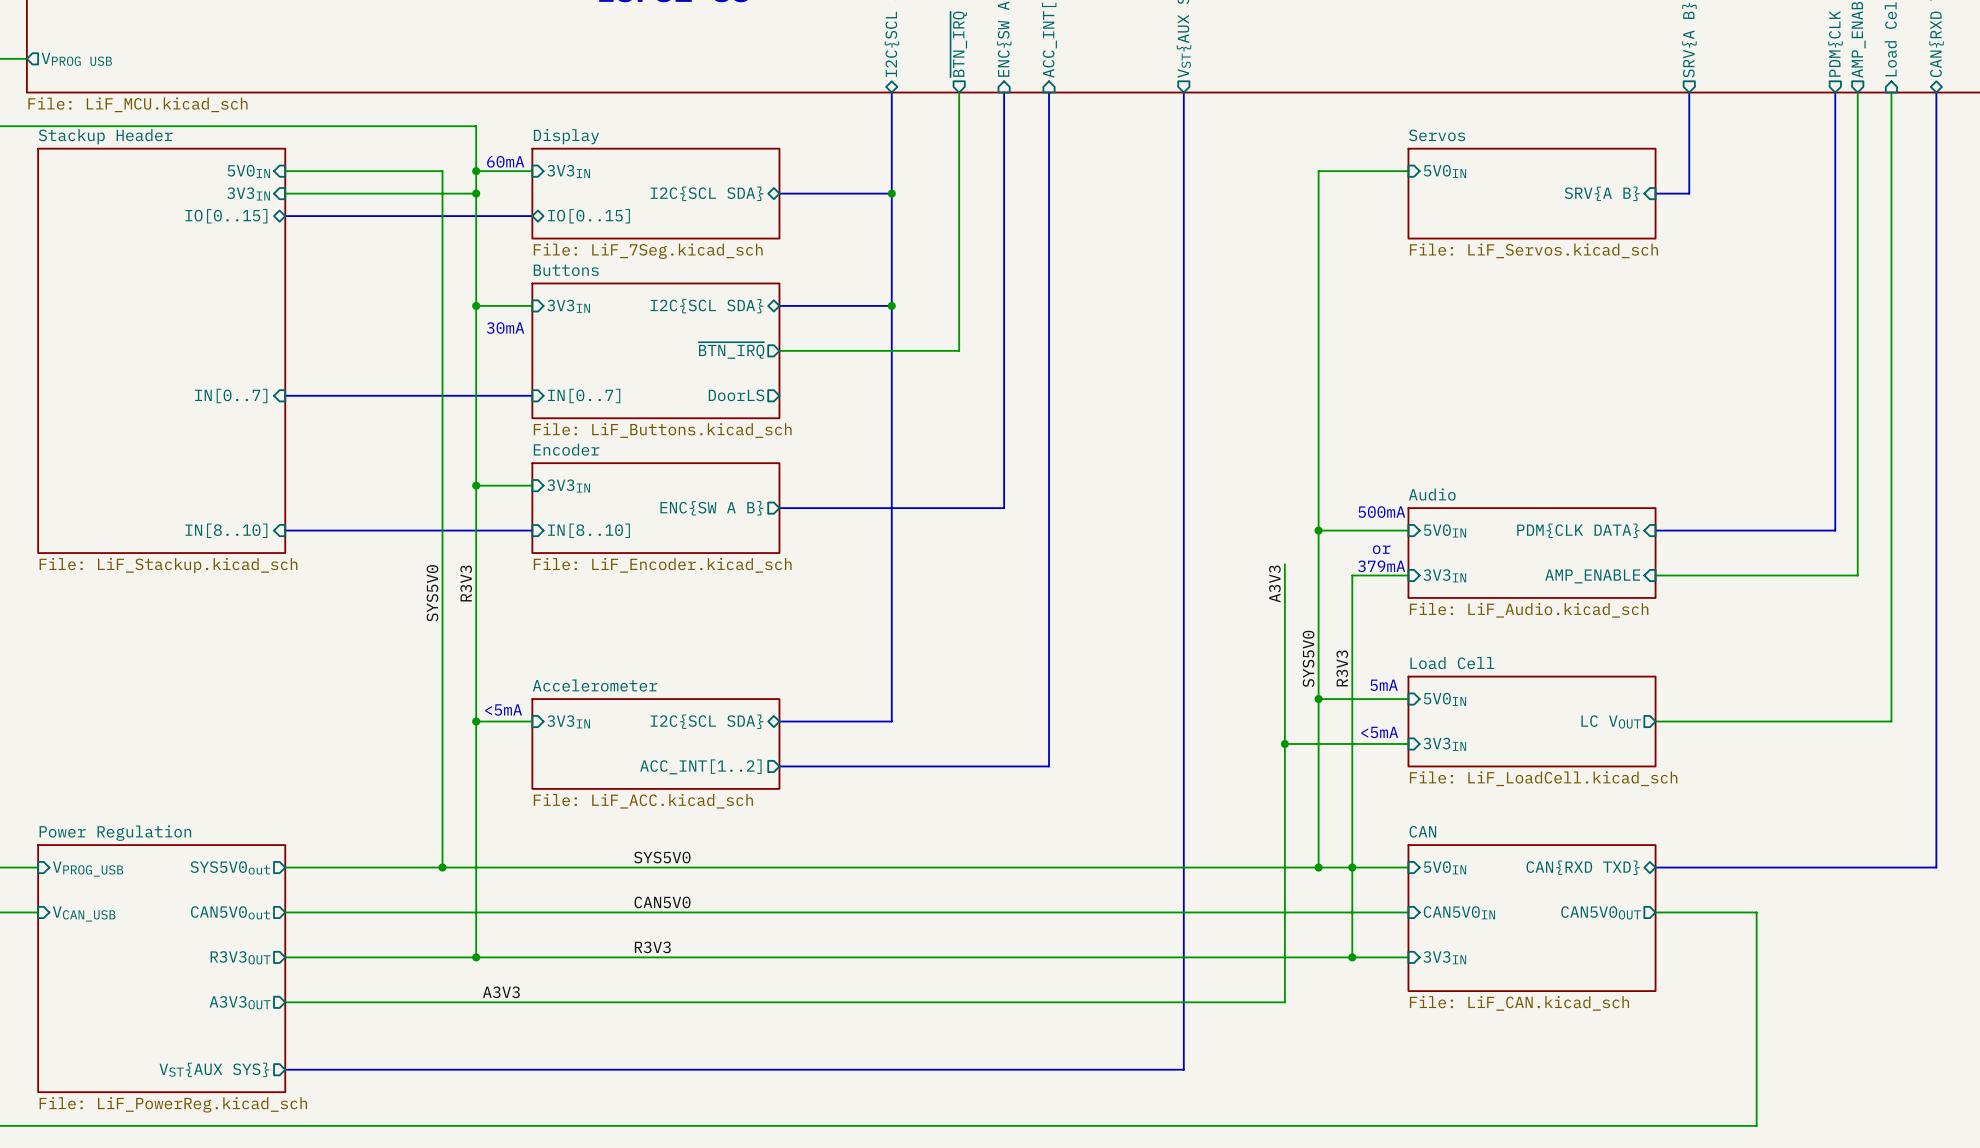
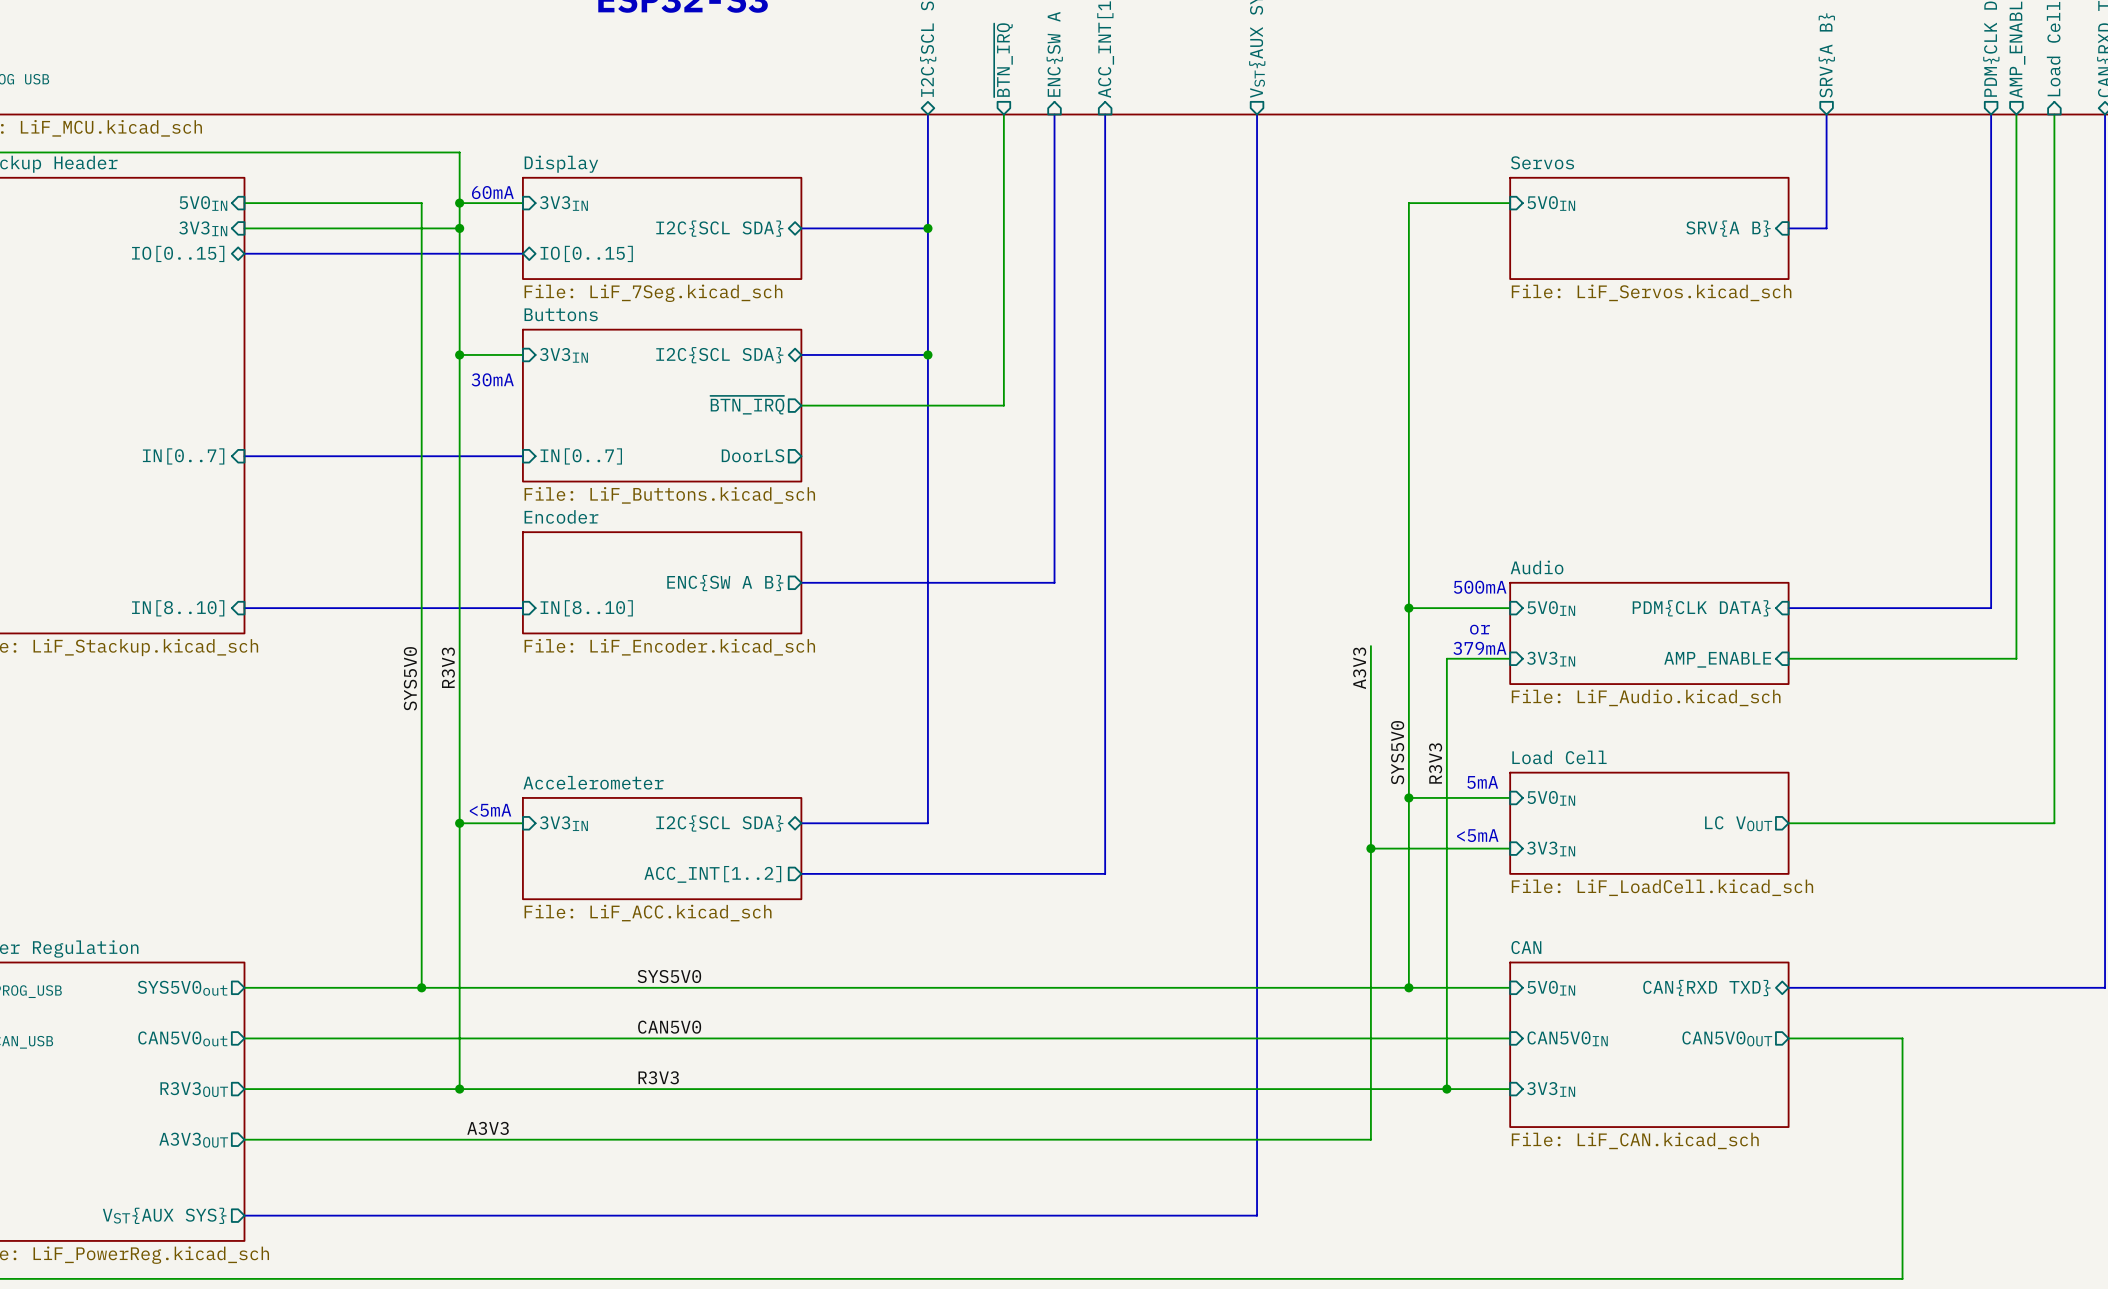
wire: (476, 485) (532, 485) -> none
junction: (476, 485) -> none
sheet pin: 3V3IN (568, 485) -> none
junction: (1352, 867) -> none

